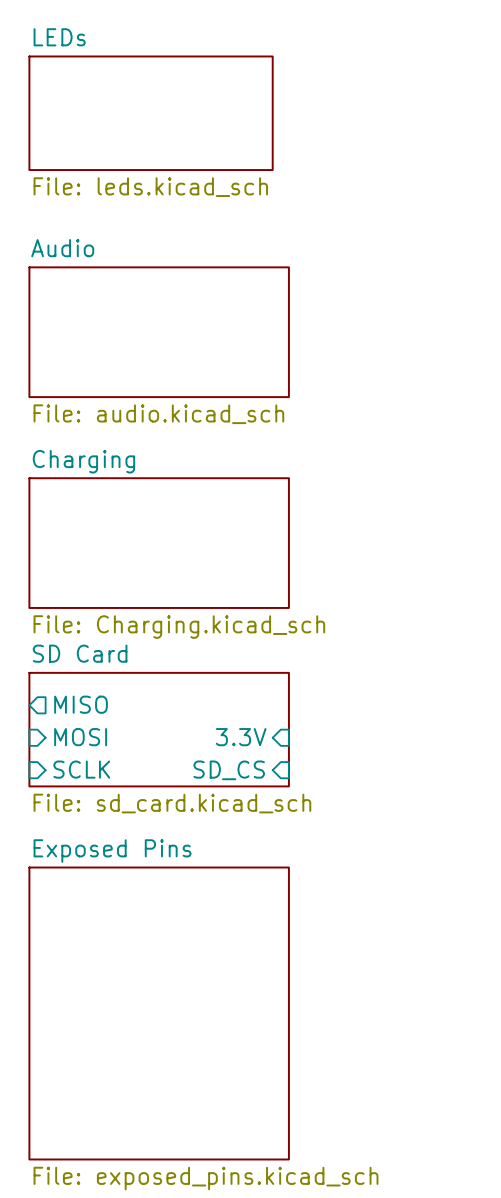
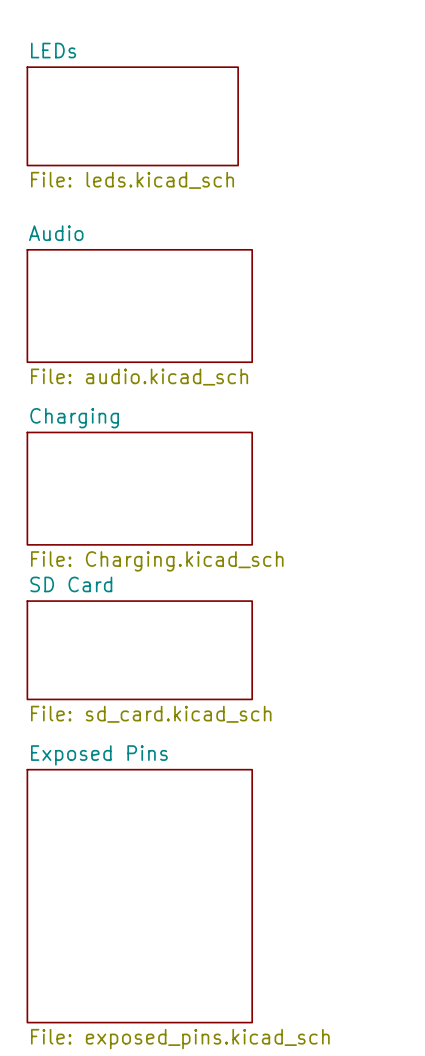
sheet pin: MISO (81, 704) -> none
sheet pin: MOSI (80, 737) -> none
sheet pin: 3.3V (241, 737) -> none
sheet pin: SCLK (81, 769) -> none
sheet pin: SD_CS (229, 770) -> none

